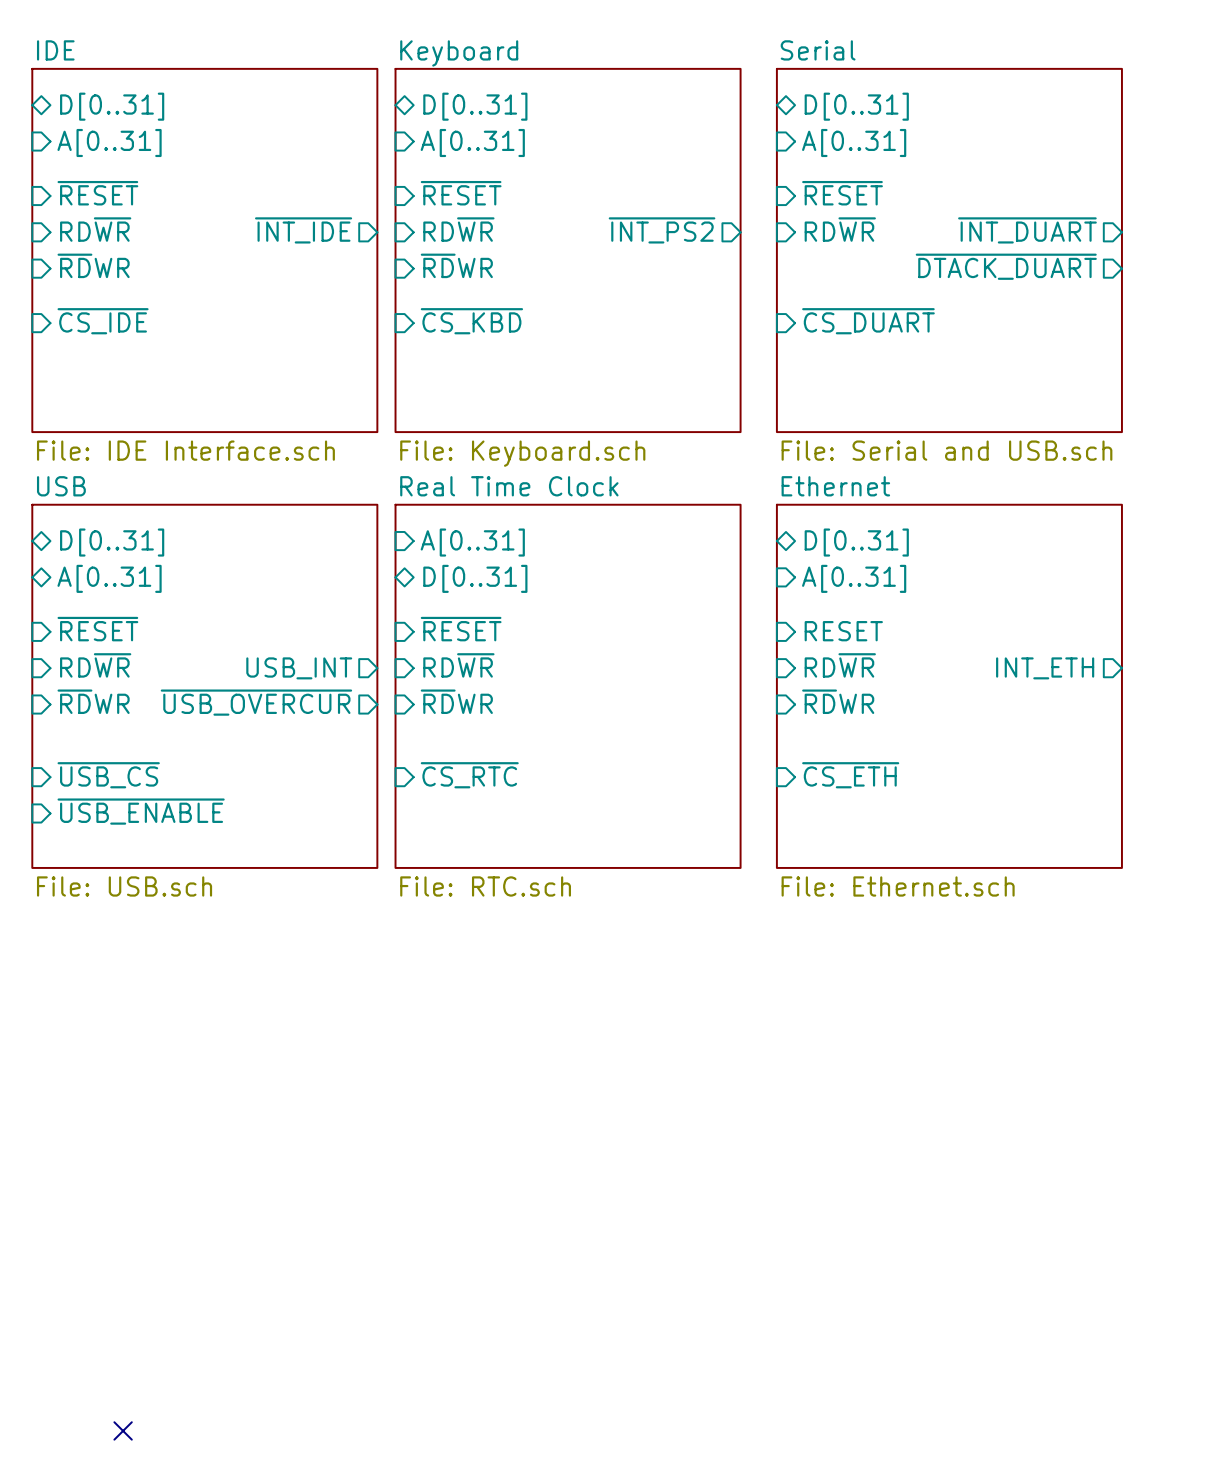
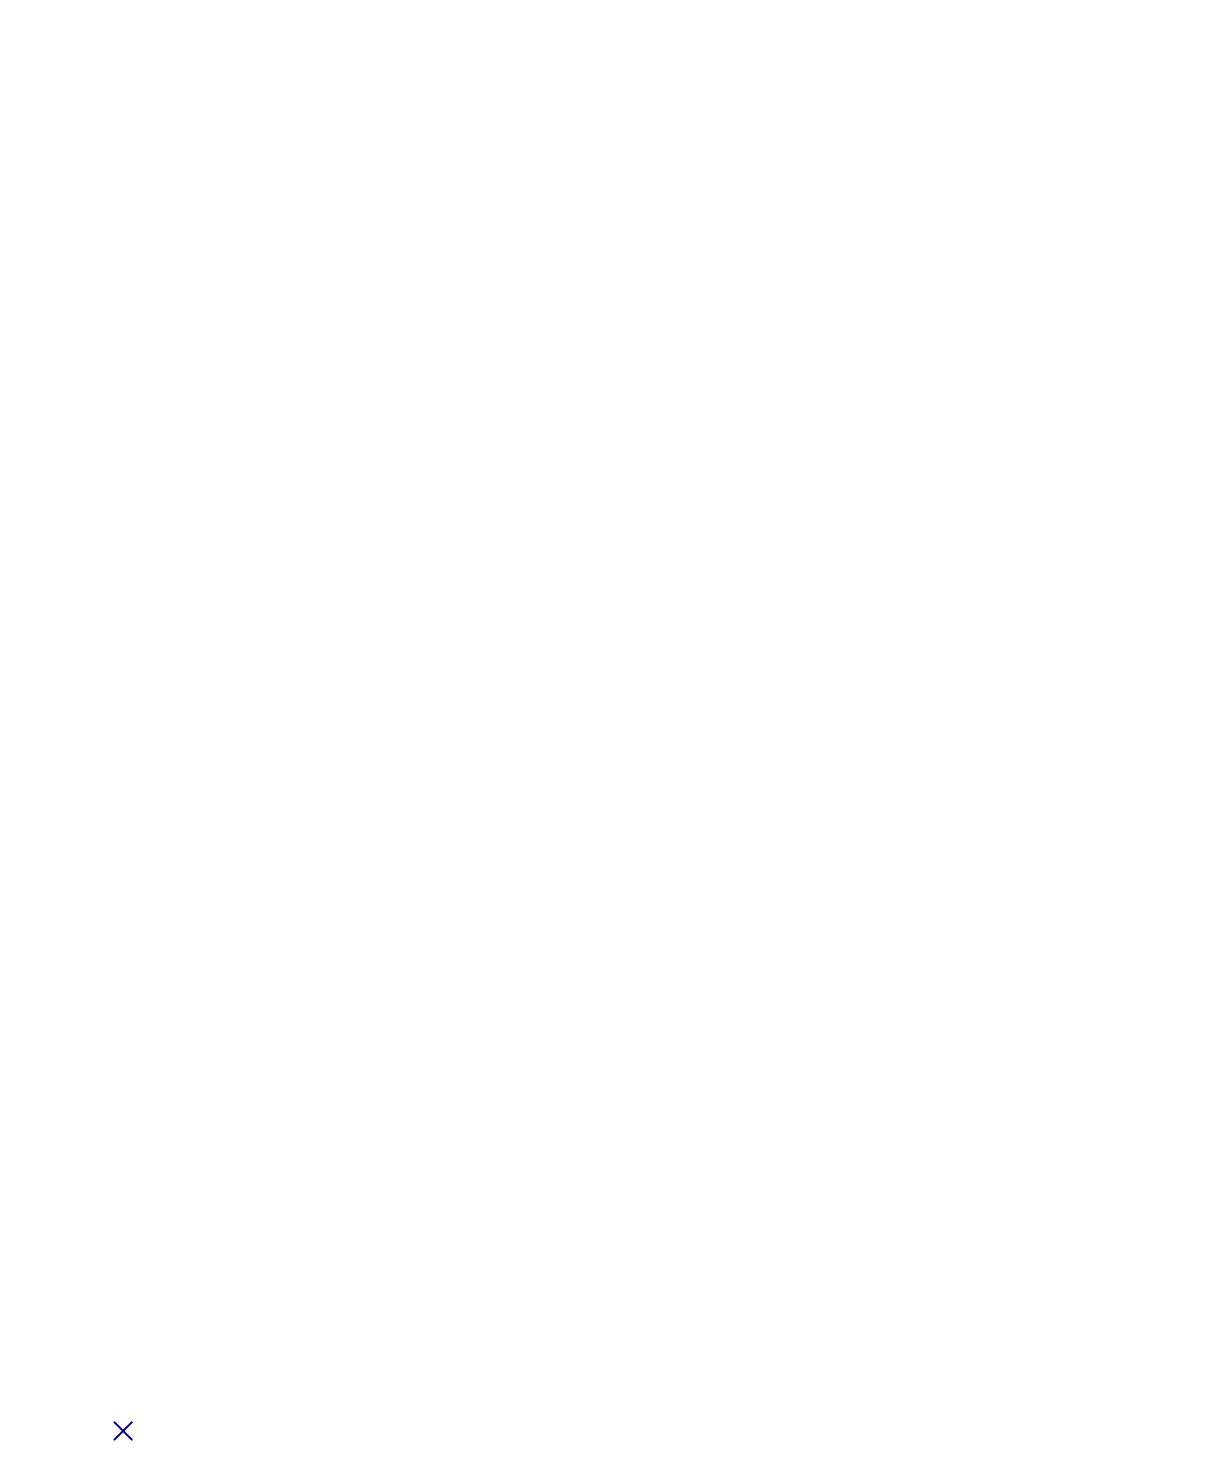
sheet pin: D[0..31] (112, 106) -> none
sheet pin: D[0..31] (475, 106) -> none
sheet pin: D[0..31] (856, 106) -> none
sheet pin: A[0..31] (109, 142) -> none
sheet pin: A[0..31] (472, 142) -> none
sheet pin: A[0..31] (854, 142) -> none
sheet pin: ~{RESET} (97, 193) -> none
sheet pin: ~{RESET} (461, 193) -> none
sheet pin: ~{RESET} (842, 193) -> none
sheet pin: RD~{WR} (95, 229) -> none
sheet pin: RD~{WR} (458, 229) -> none
sheet pin: RD~{WR} (840, 229) -> none
sheet pin: ~{INT_IDE} (303, 230) -> none
sheet pin: ~{INT_PS2} (662, 230) -> none
sheet pin: ~{INT_DUART} (1027, 230) -> none
sheet IDE: File: IDE Interface.sch (204, 250) -> none
sheet Keyboard: File: Keyboard.sch (568, 250) -> none
sheet Serial: File: Serial and USB.sch (949, 250) -> none
sheet pin: ~{RD}WR (93, 265) -> none
sheet pin: ~{RD}WR (456, 265) -> none
sheet pin: ~{DTACK_DUART} (1006, 266) -> none
sheet pin: ~{CS_IDE} (103, 321) -> none
sheet pin: ~{CS_KBD} (471, 321) -> none
sheet pin: ~{CS_DUART} (868, 321) -> none
sheet pin: D[0..31] (112, 542) -> none
sheet pin: A[0..31] (472, 542) -> none
sheet pin: D[0..31] (856, 542) -> none
sheet pin: A[0..31] (109, 578) -> none
sheet pin: D[0..31] (475, 578) -> none
sheet pin: A[0..31] (854, 578) -> none
sheet pin: ~{RESET} (97, 629) -> none
sheet pin: ~{RESET} (461, 629) -> none
sheet pin: RESET (843, 631) -> none
sheet pin: RD~{WR} (95, 665) -> none
sheet pin: RD~{WR} (458, 665) -> none
sheet pin: RD~{WR} (840, 665) -> none
sheet pin: USB_INT (299, 668) -> none
sheet pin: INT_ETH (1045, 668) -> none
sheet USB: File: USB.sch (204, 686) -> none
sheet Real Time Clock: File: RTC.sch (568, 686) -> none
sheet Ethernet: File: Ethernet.sch (949, 686) -> none
sheet pin: ~{RD}WR (93, 701) -> none
sheet pin: ~{RD}WR (456, 701) -> none
sheet pin: ~{RD}WR (838, 701) -> none
sheet pin: ~{USB_OVERCUR} (256, 702) -> none
sheet pin: ~{USB_CS} (108, 775) -> none
sheet pin: ~{CS_RTC} (469, 775) -> none
sheet pin: ~{CS_ETH} (850, 775) -> none
sheet pin: ~{USB_ENABLE} (141, 811) -> none

